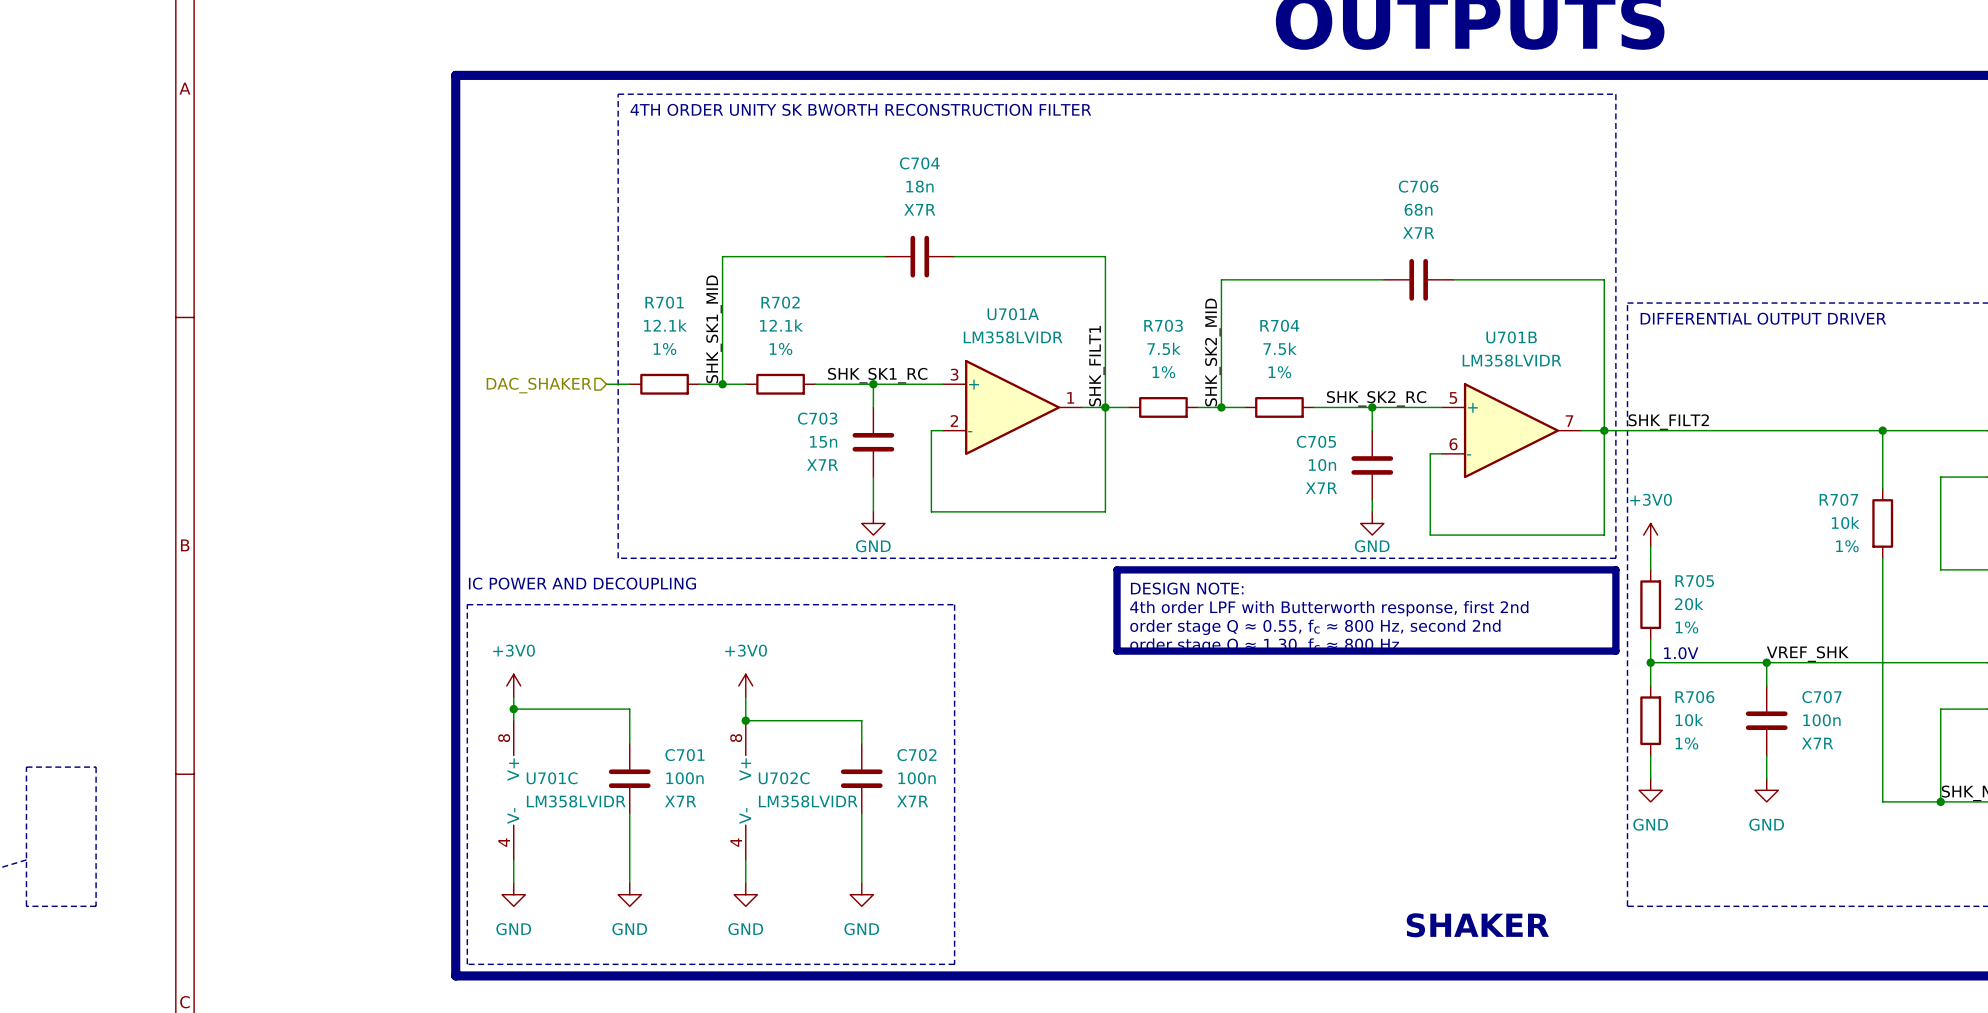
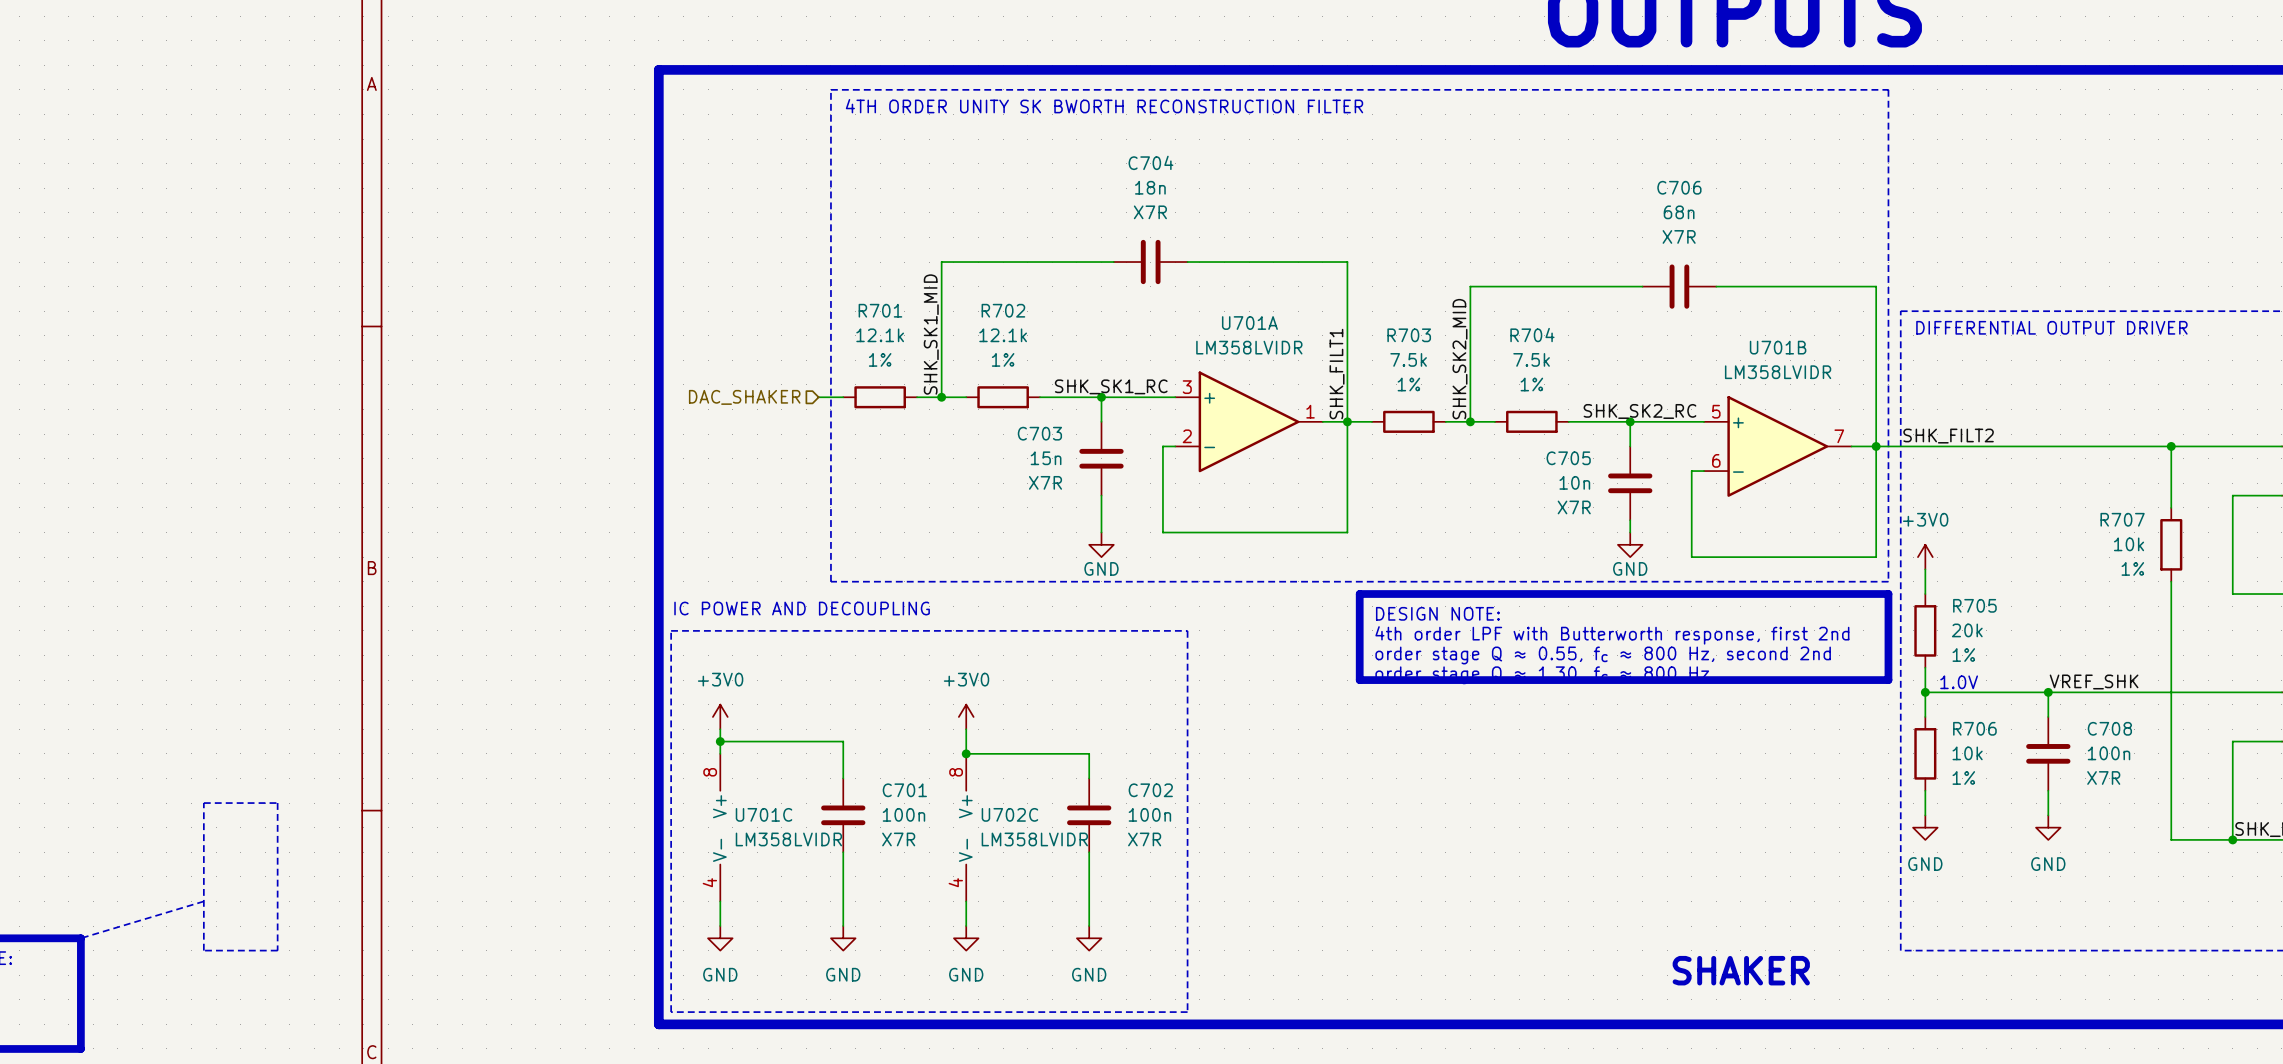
C707 name: C707 (1822, 697) -> C708 (2109, 728)

